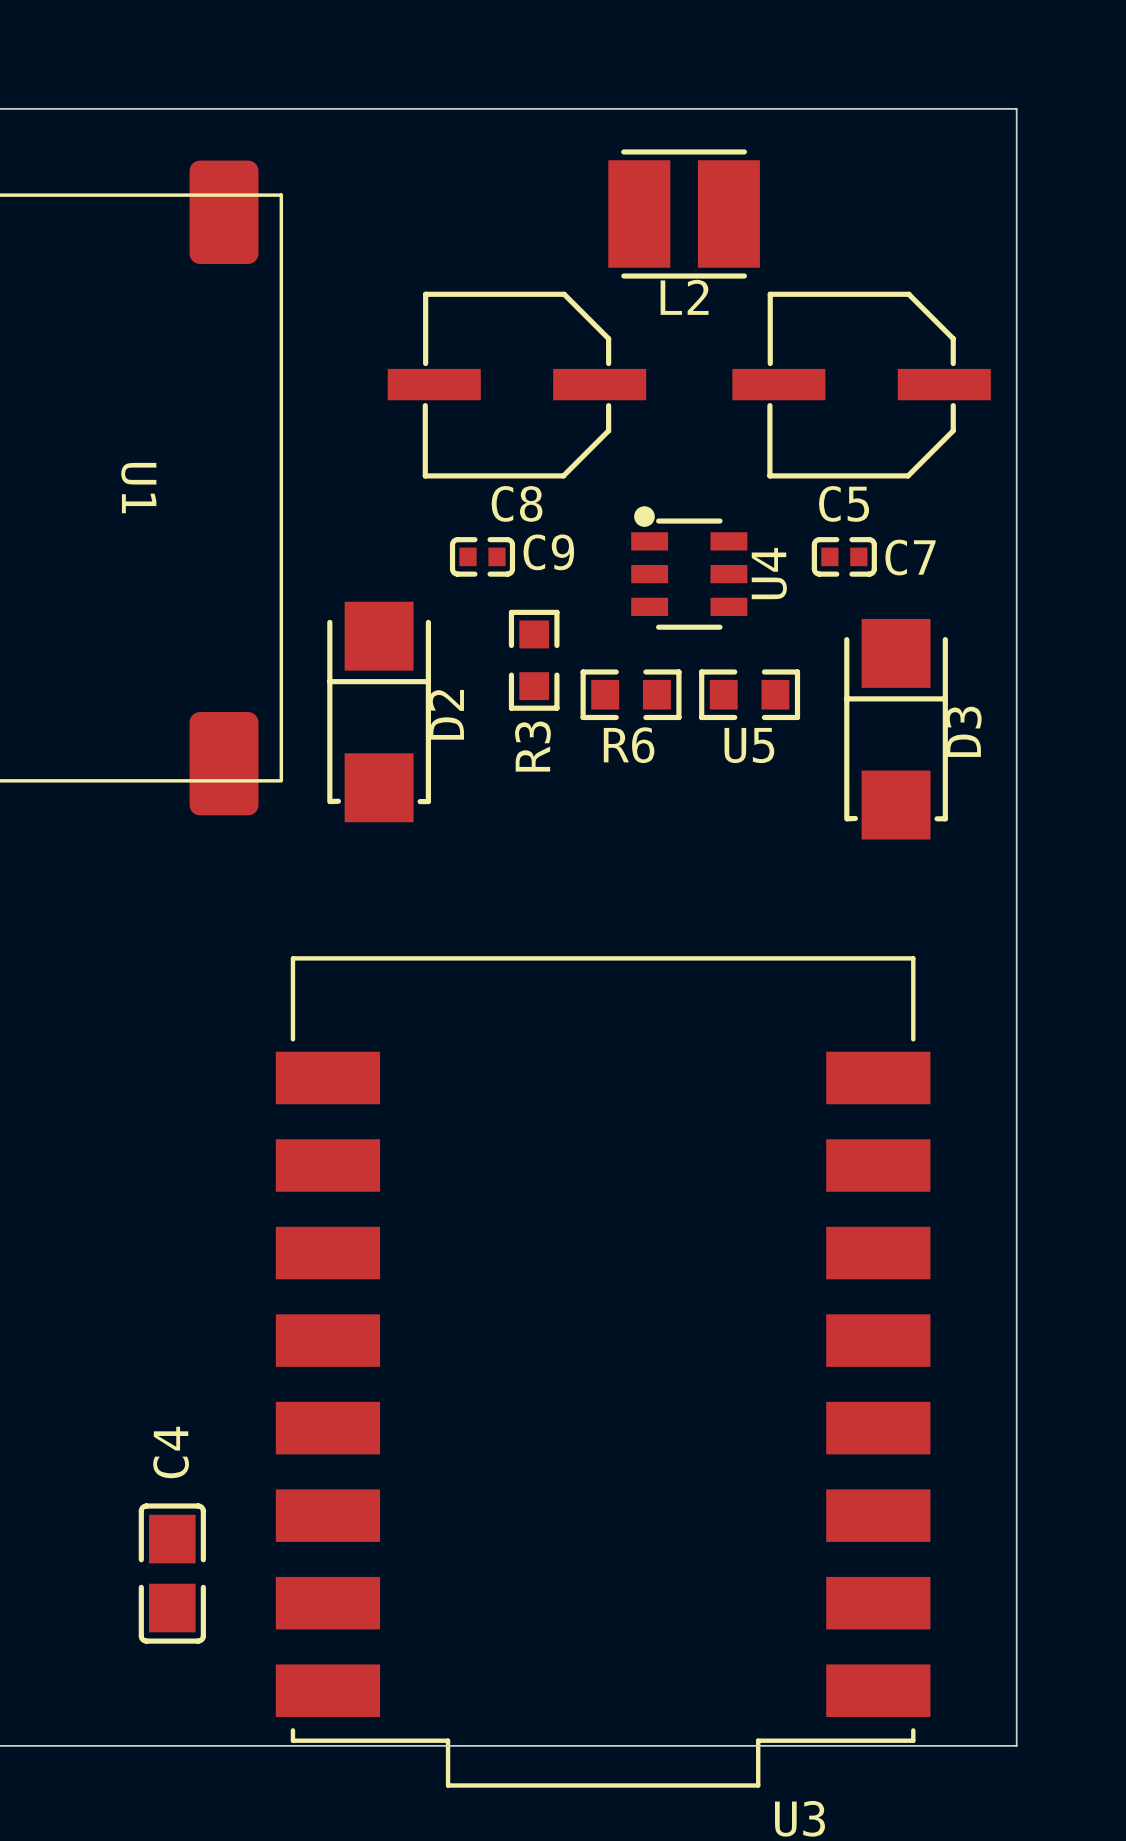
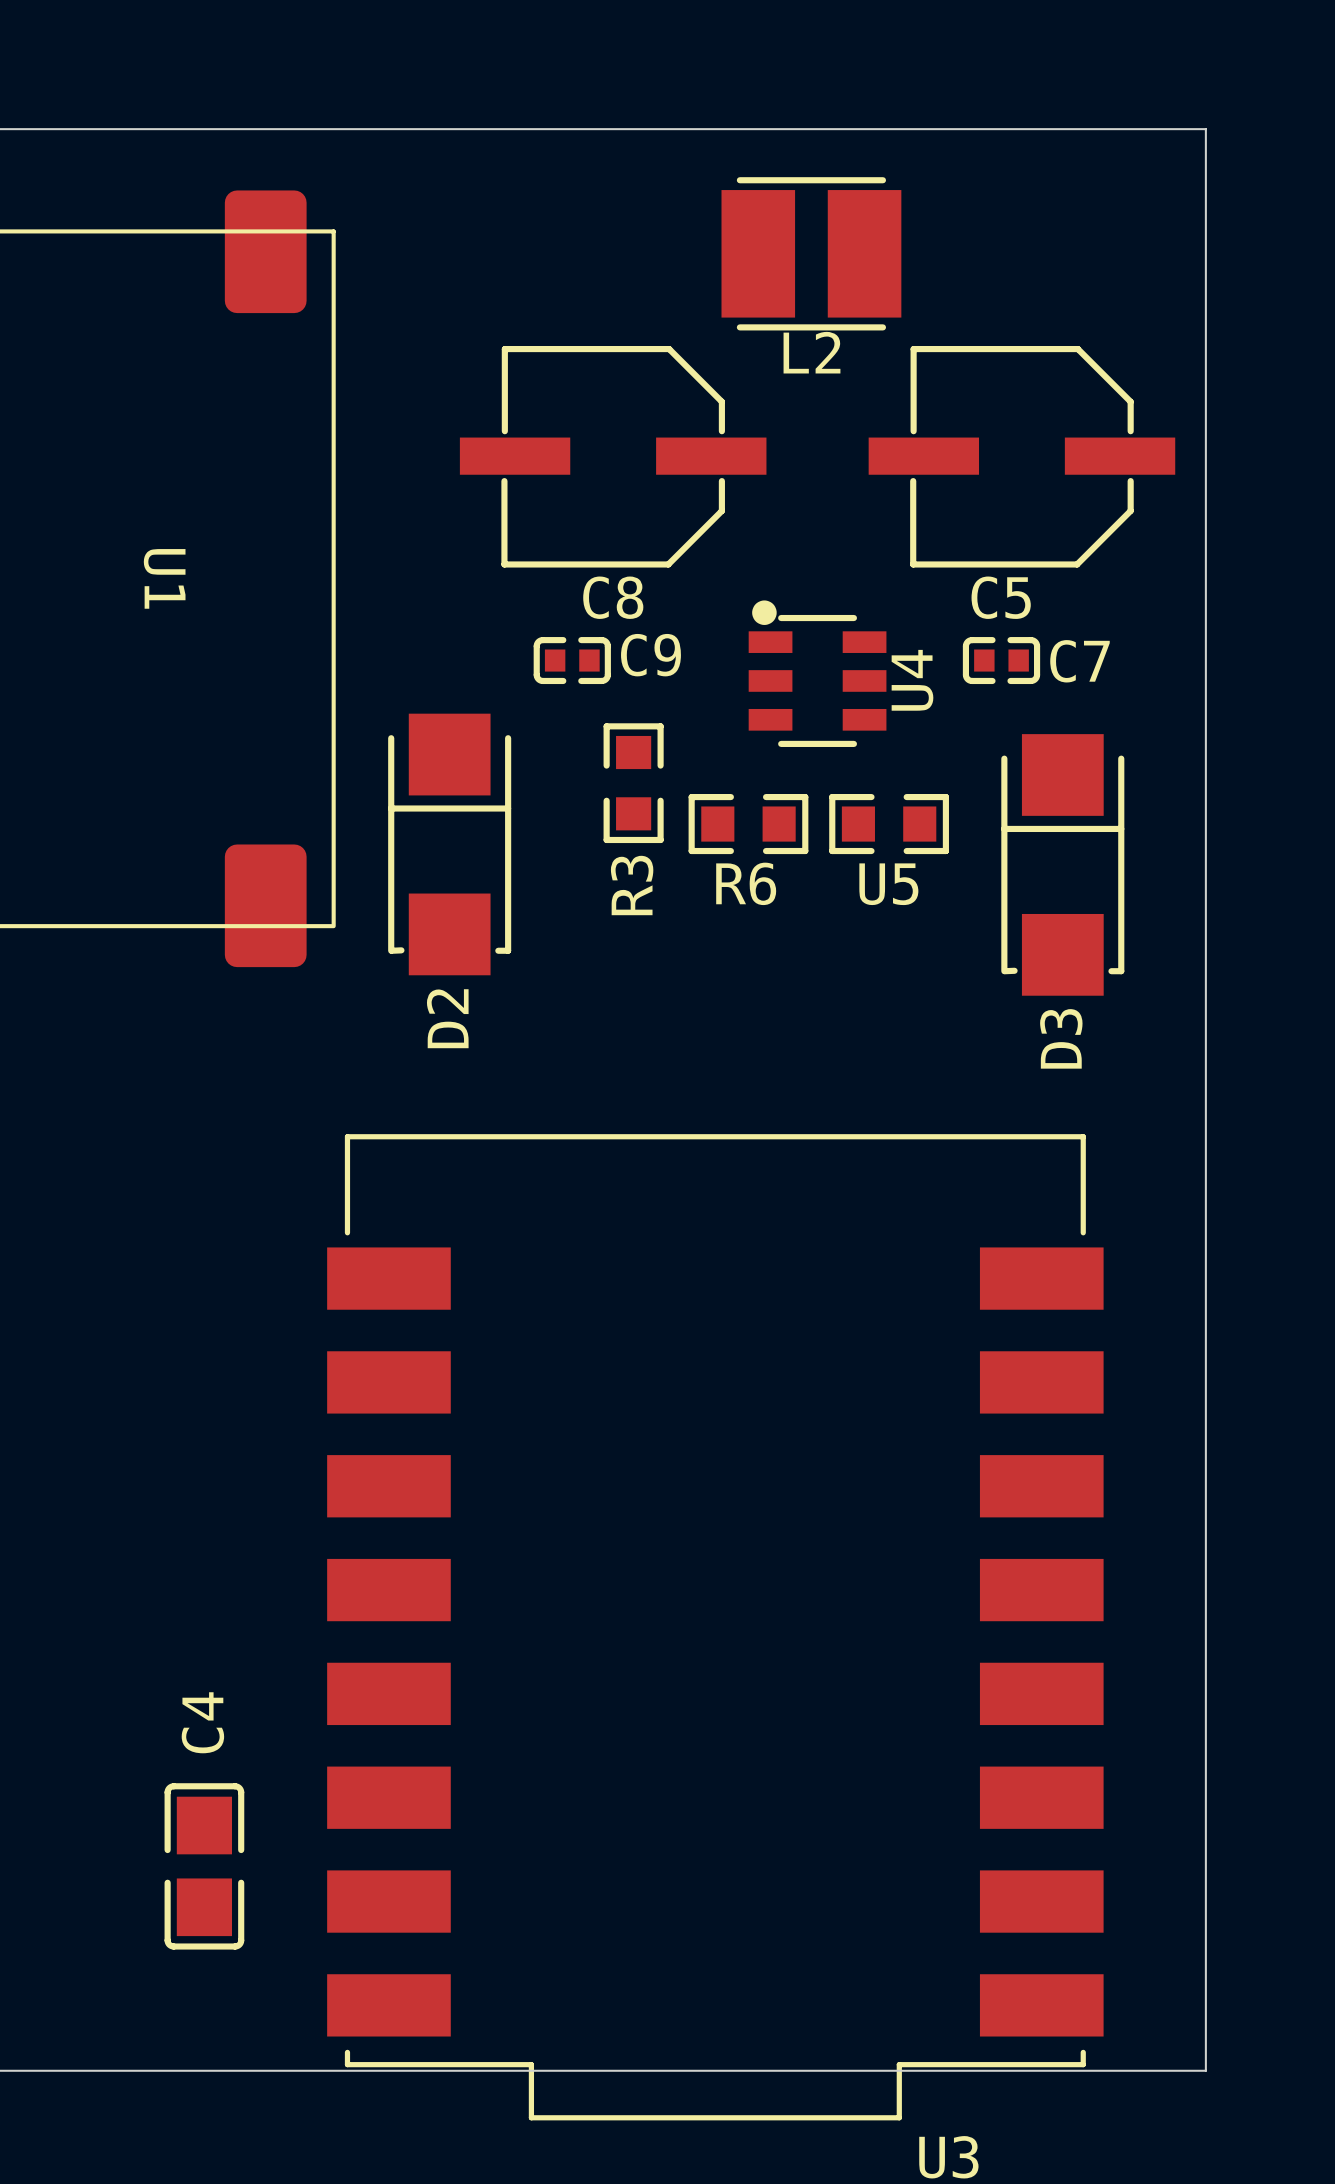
D2 name position: D2 (446, 714) -> D2 (447, 1018)
D3 name position: D3 (963, 731) -> D3 (1061, 1038)

